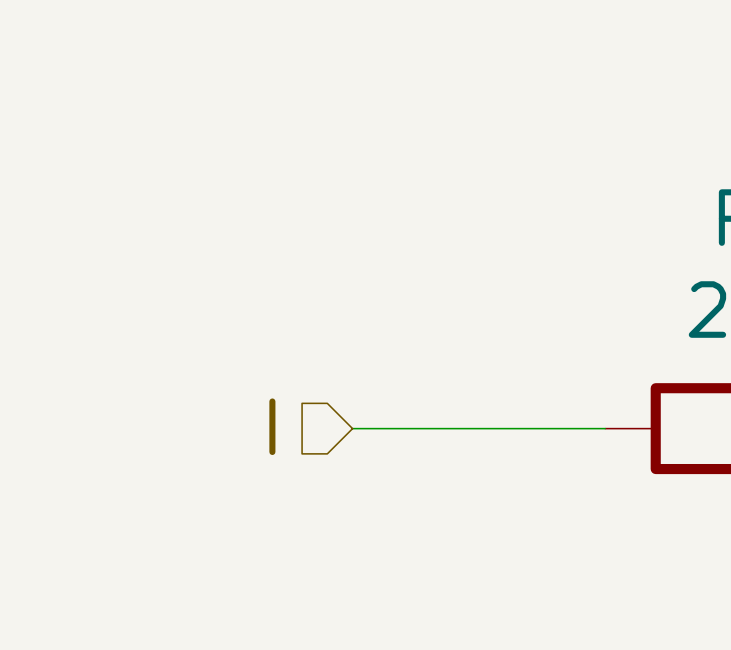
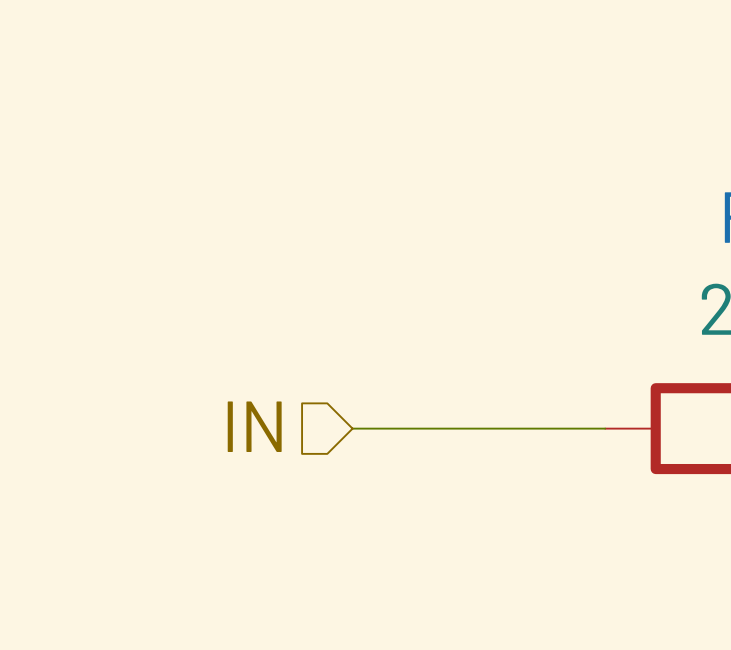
hierarchical label: I (272, 426) -> IN (254, 426)

